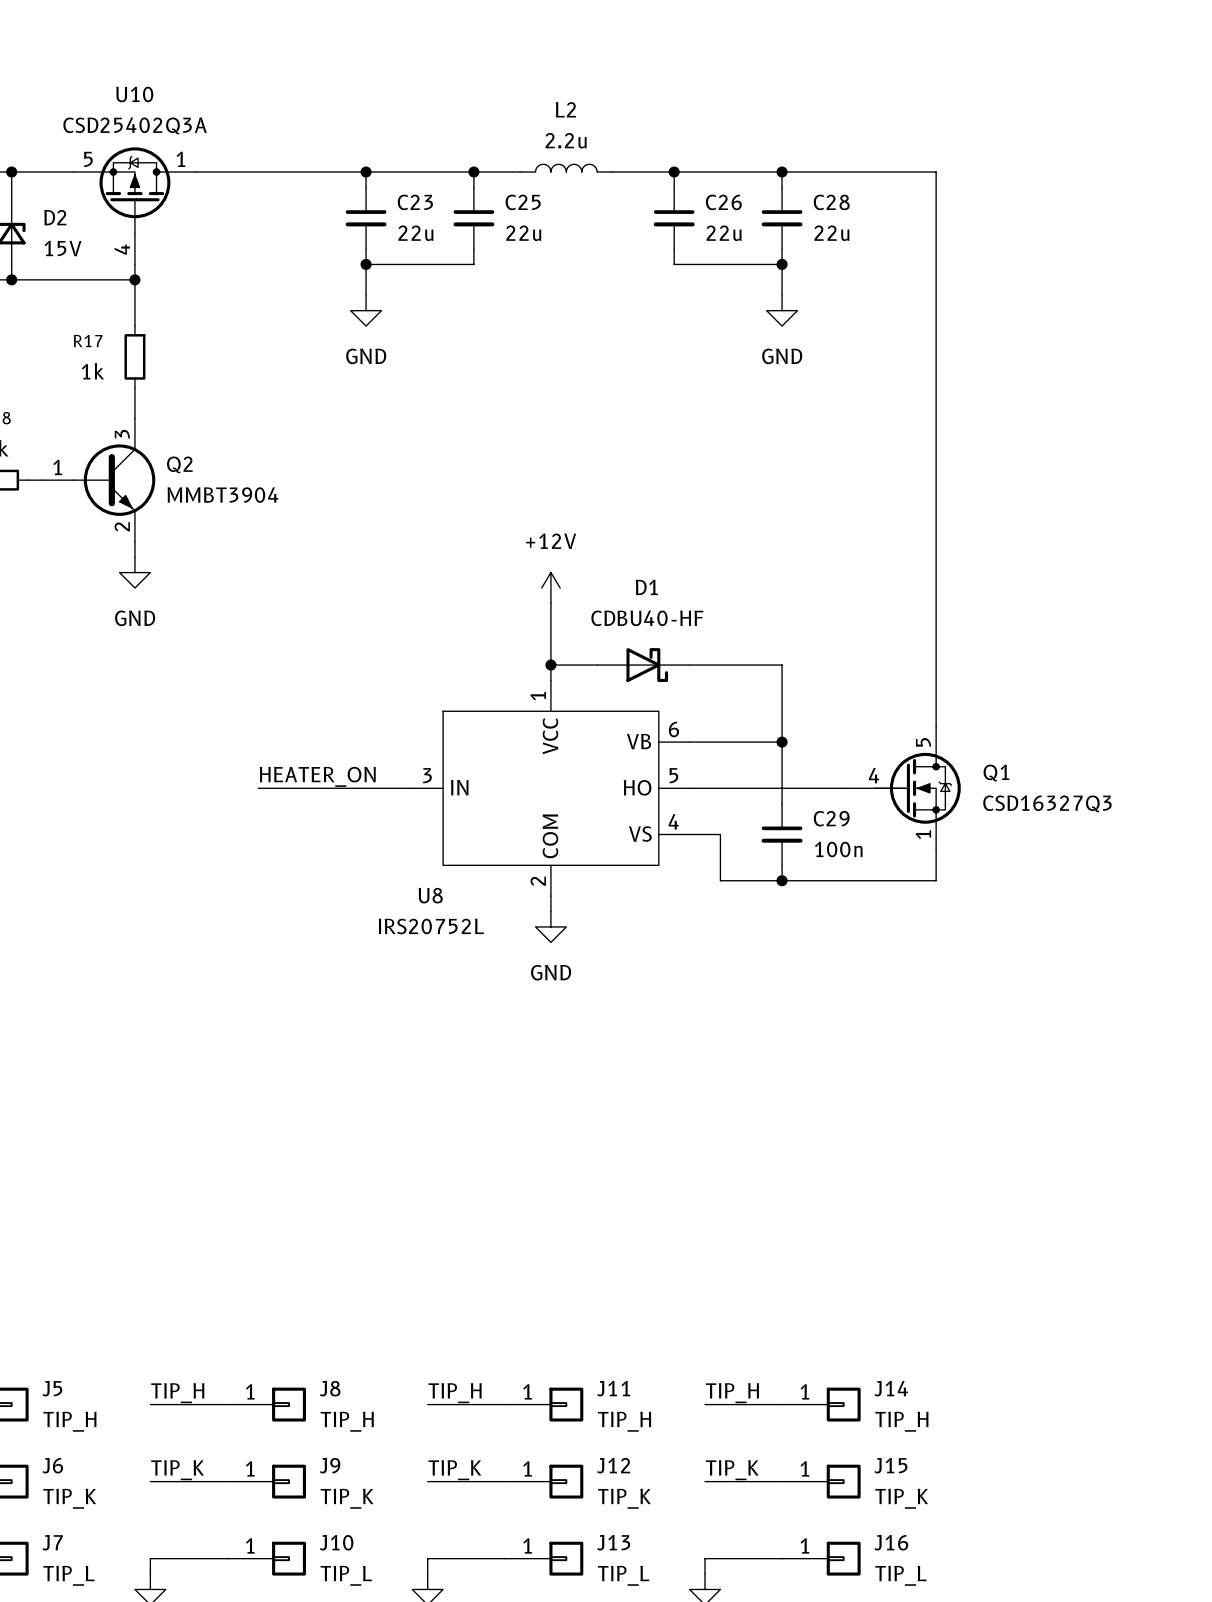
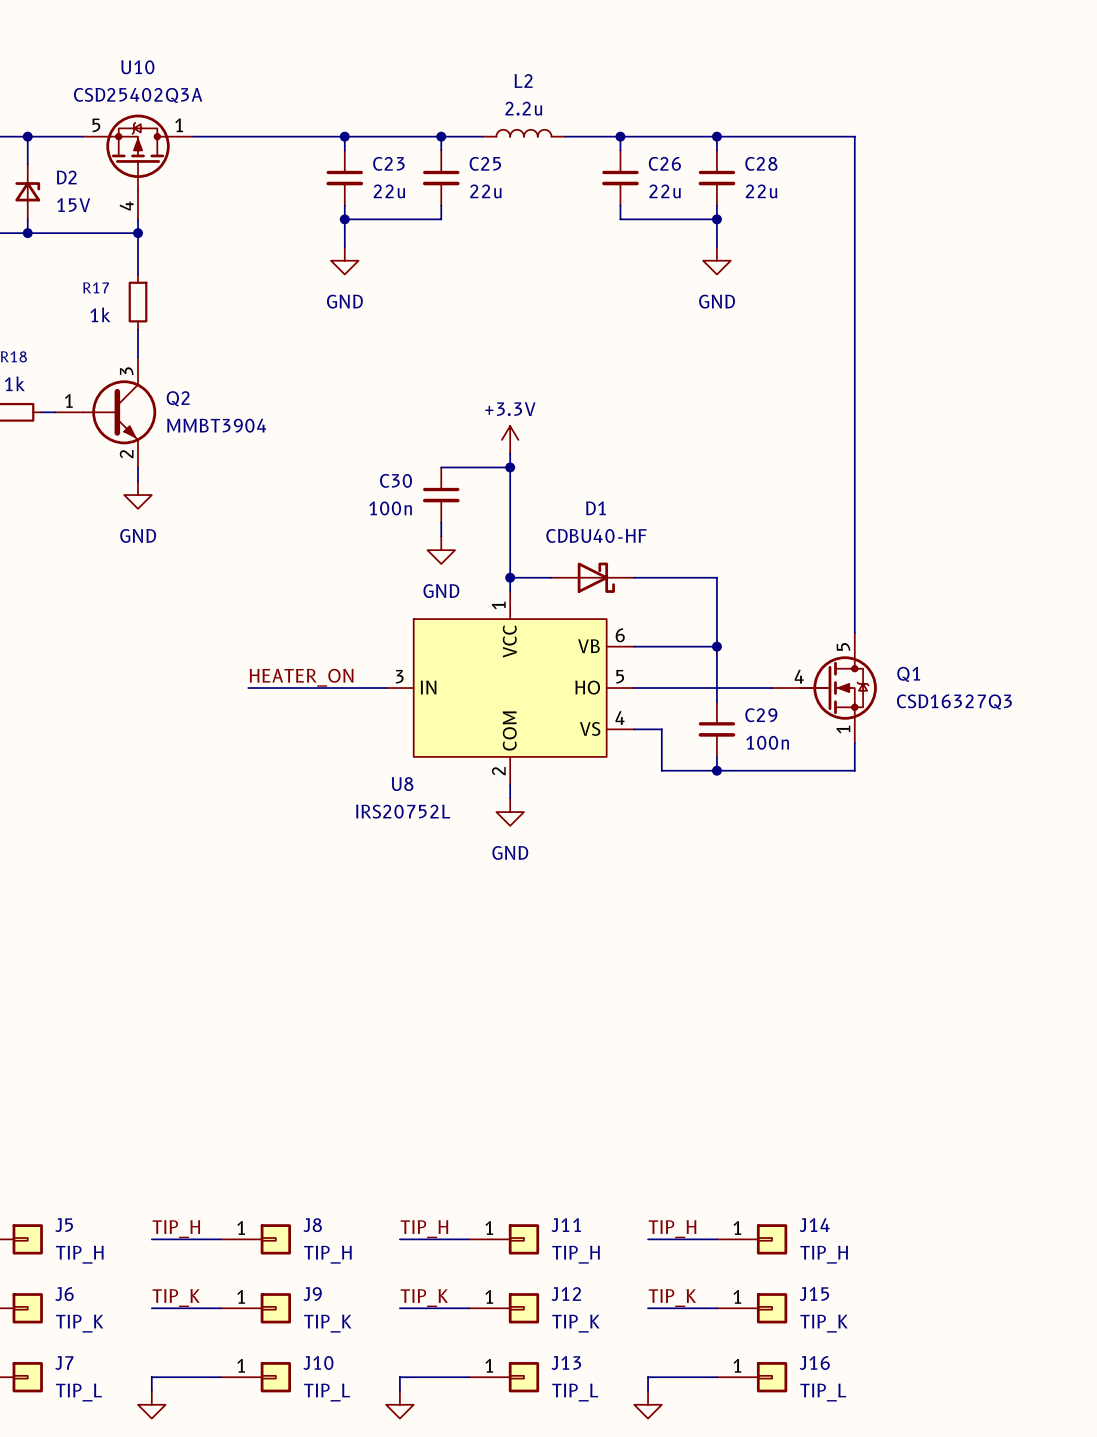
power symbol: none -> +3.3V (510, 439)
wire: none -> (510, 453) (510, 522)
wire: none -> (441, 467) (510, 467)
junction: none -> (510, 467)
C30: none -> 100n (441, 495)
power symbol: +12V (550, 588) -> none
wire: none -> (441, 522) (441, 536)
power symbol: none -> GND (441, 550)

